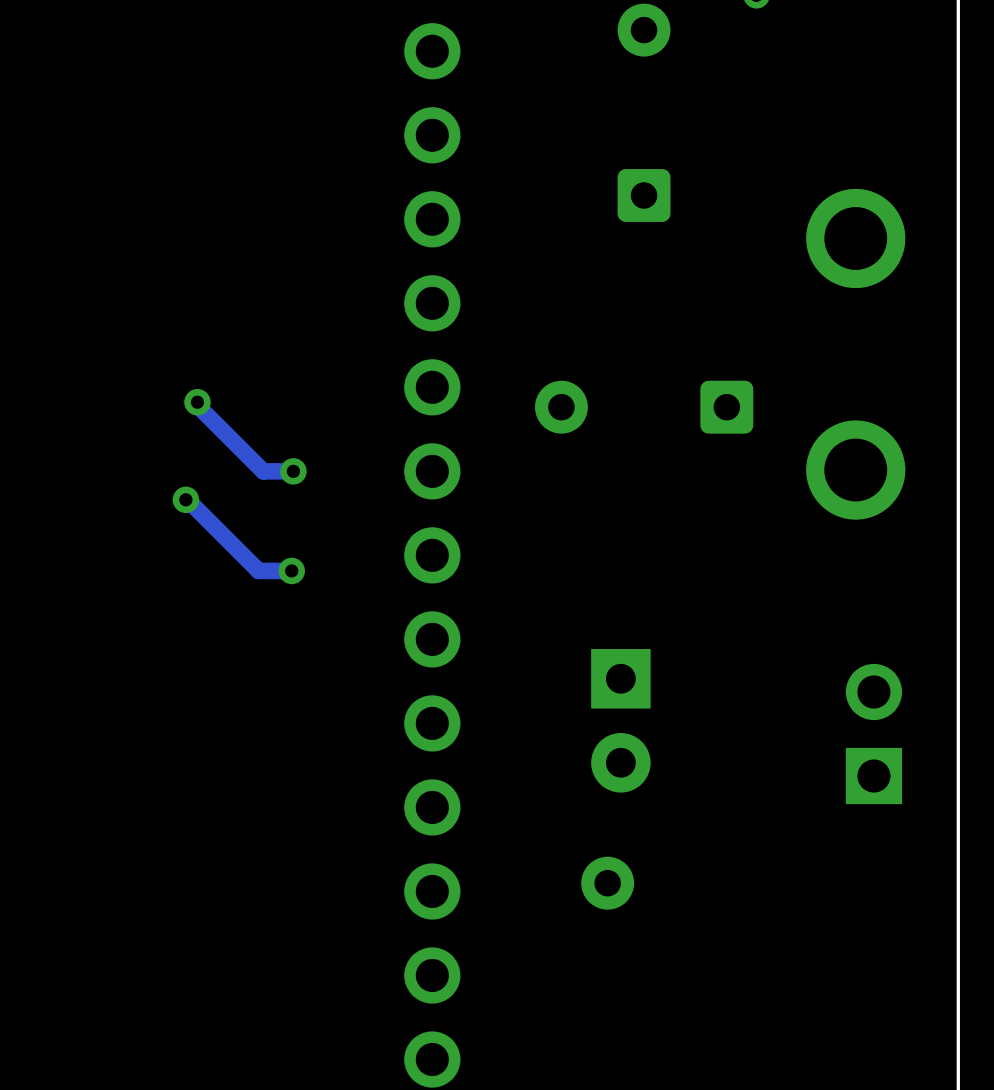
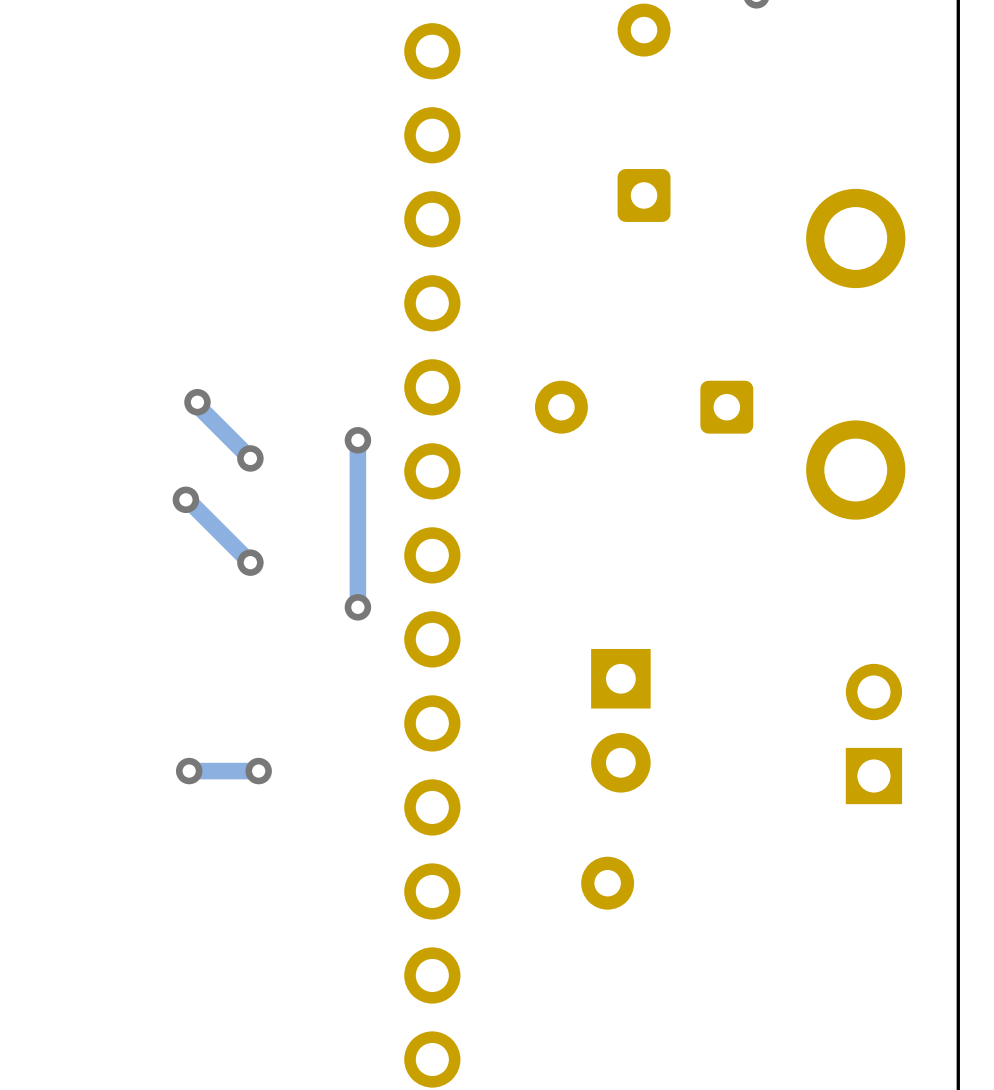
track: none -> (357, 440) (357, 607)
via: none -> (357, 440)
track: (250, 458) (263, 471) (293, 471) -> none
via: none -> (250, 458)
via: (293, 471) -> none
track: (250, 562) (258, 570) (291, 570) -> none
via: none -> (250, 562)
via: (291, 570) -> none
via: none -> (357, 607)
via: none -> (189, 771)
track: none -> (258, 771) (189, 771)
via: none -> (258, 771)

